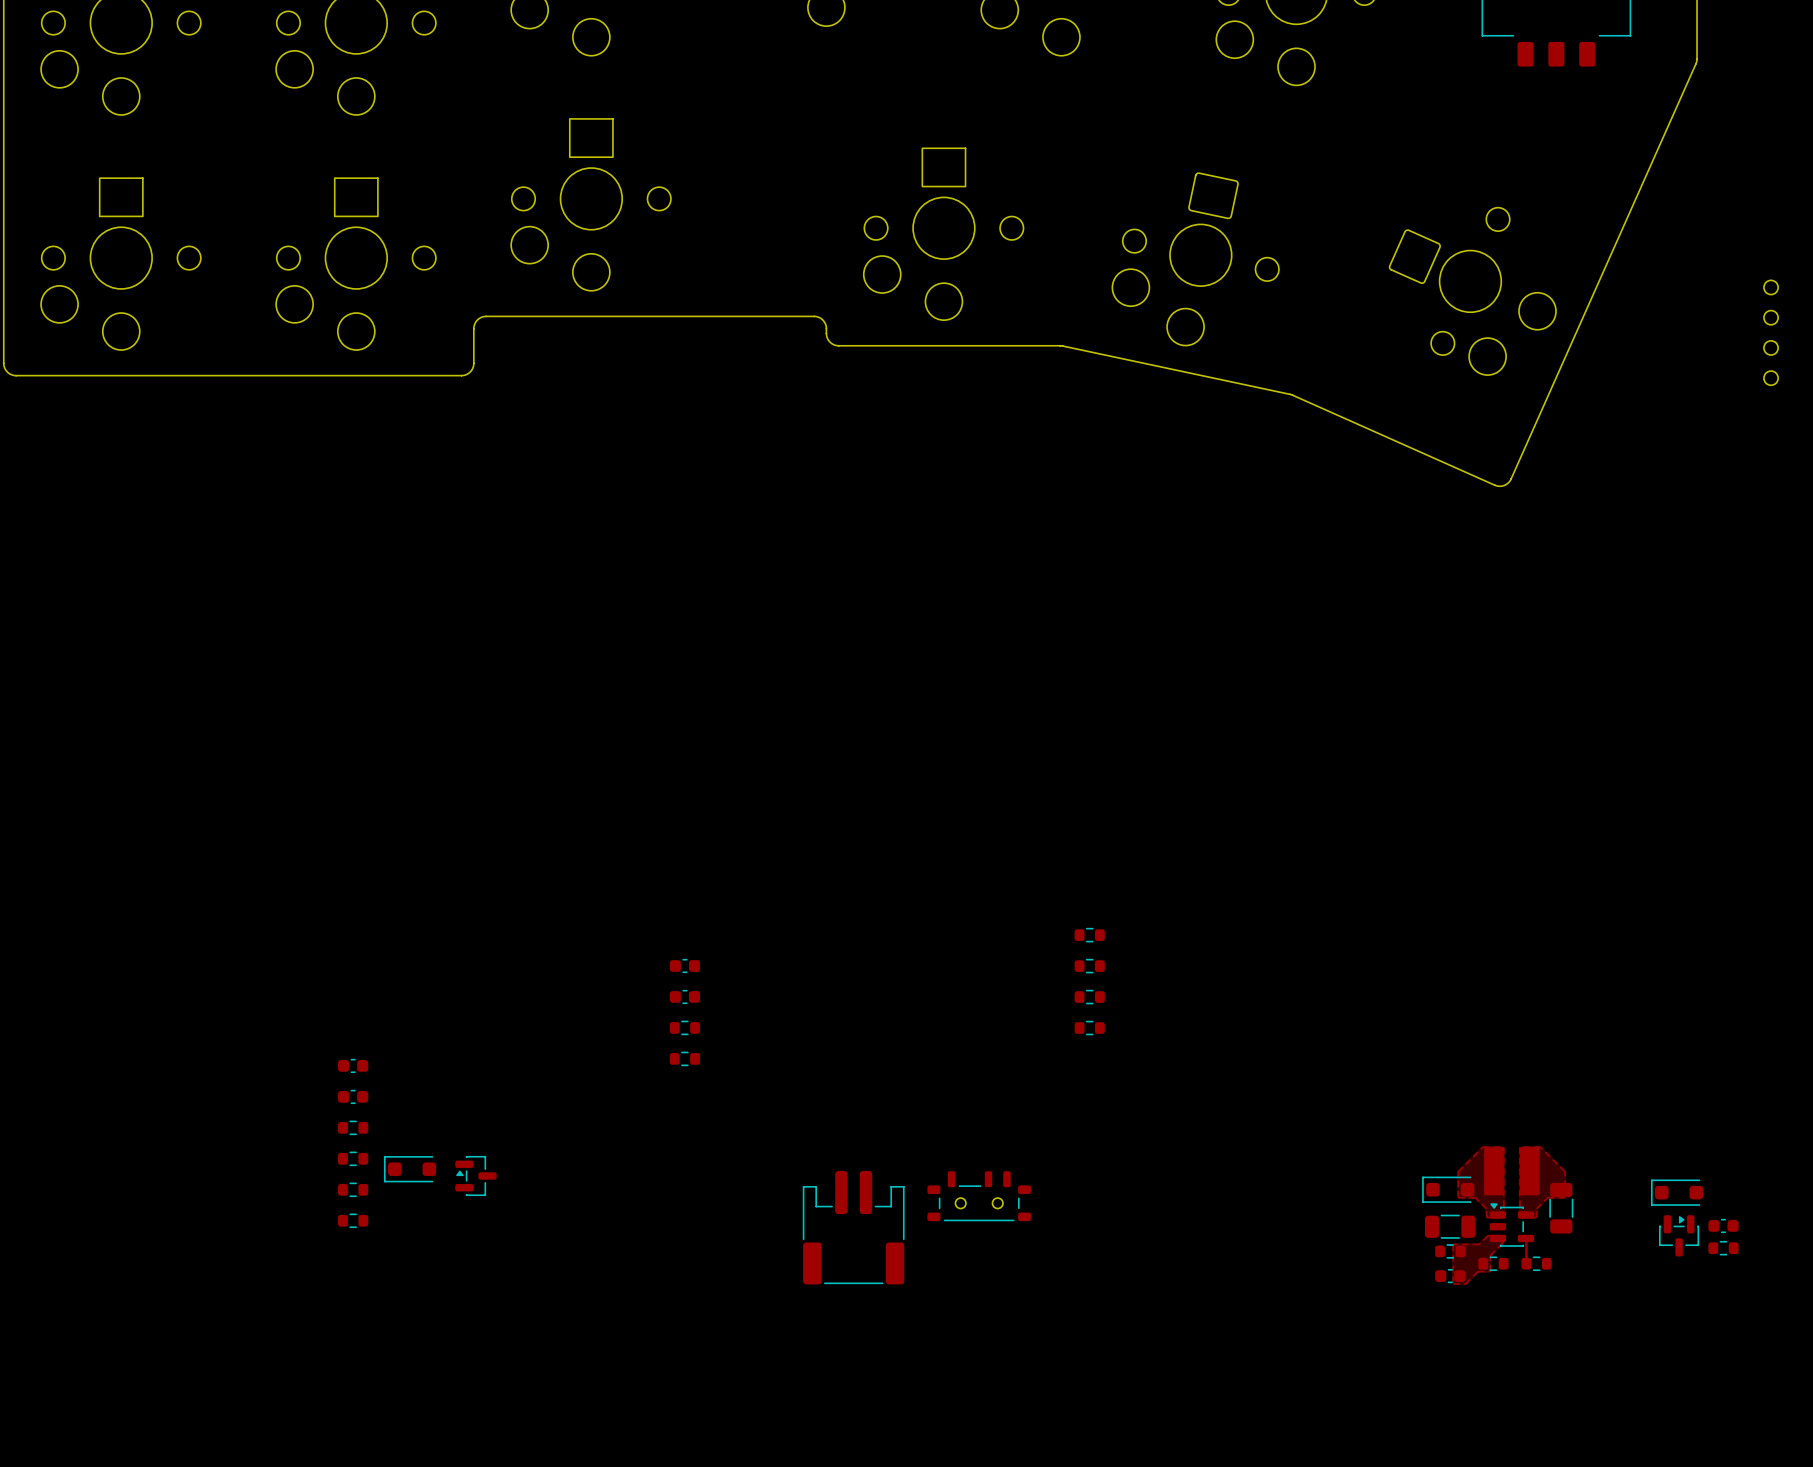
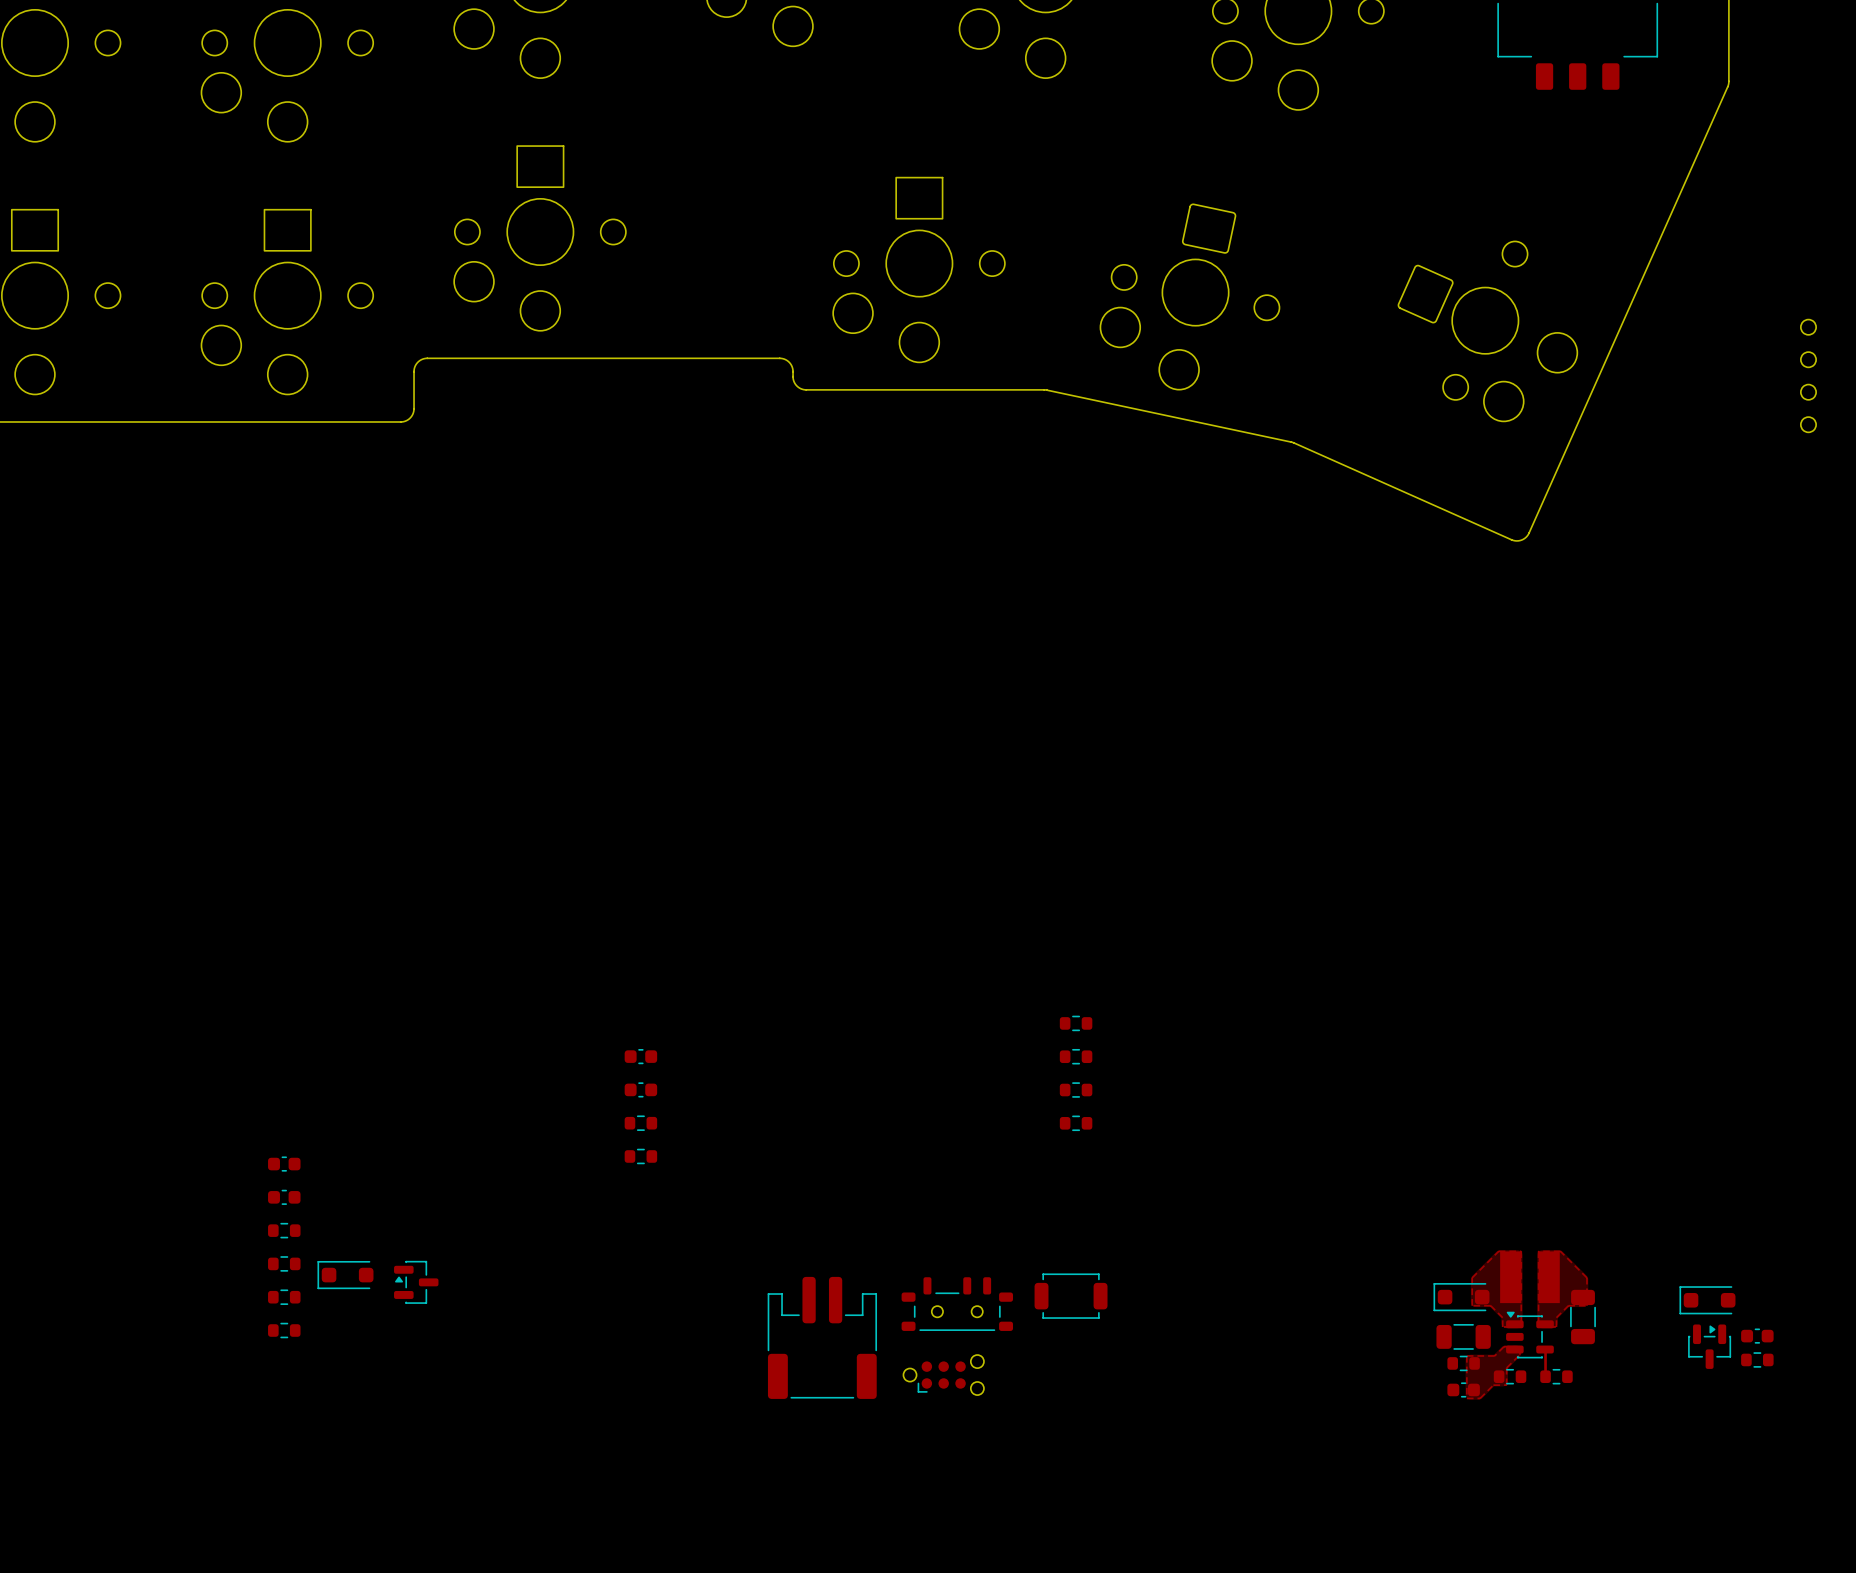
part: none -> (1071, 1296)
part: none -> (943, 1375)

